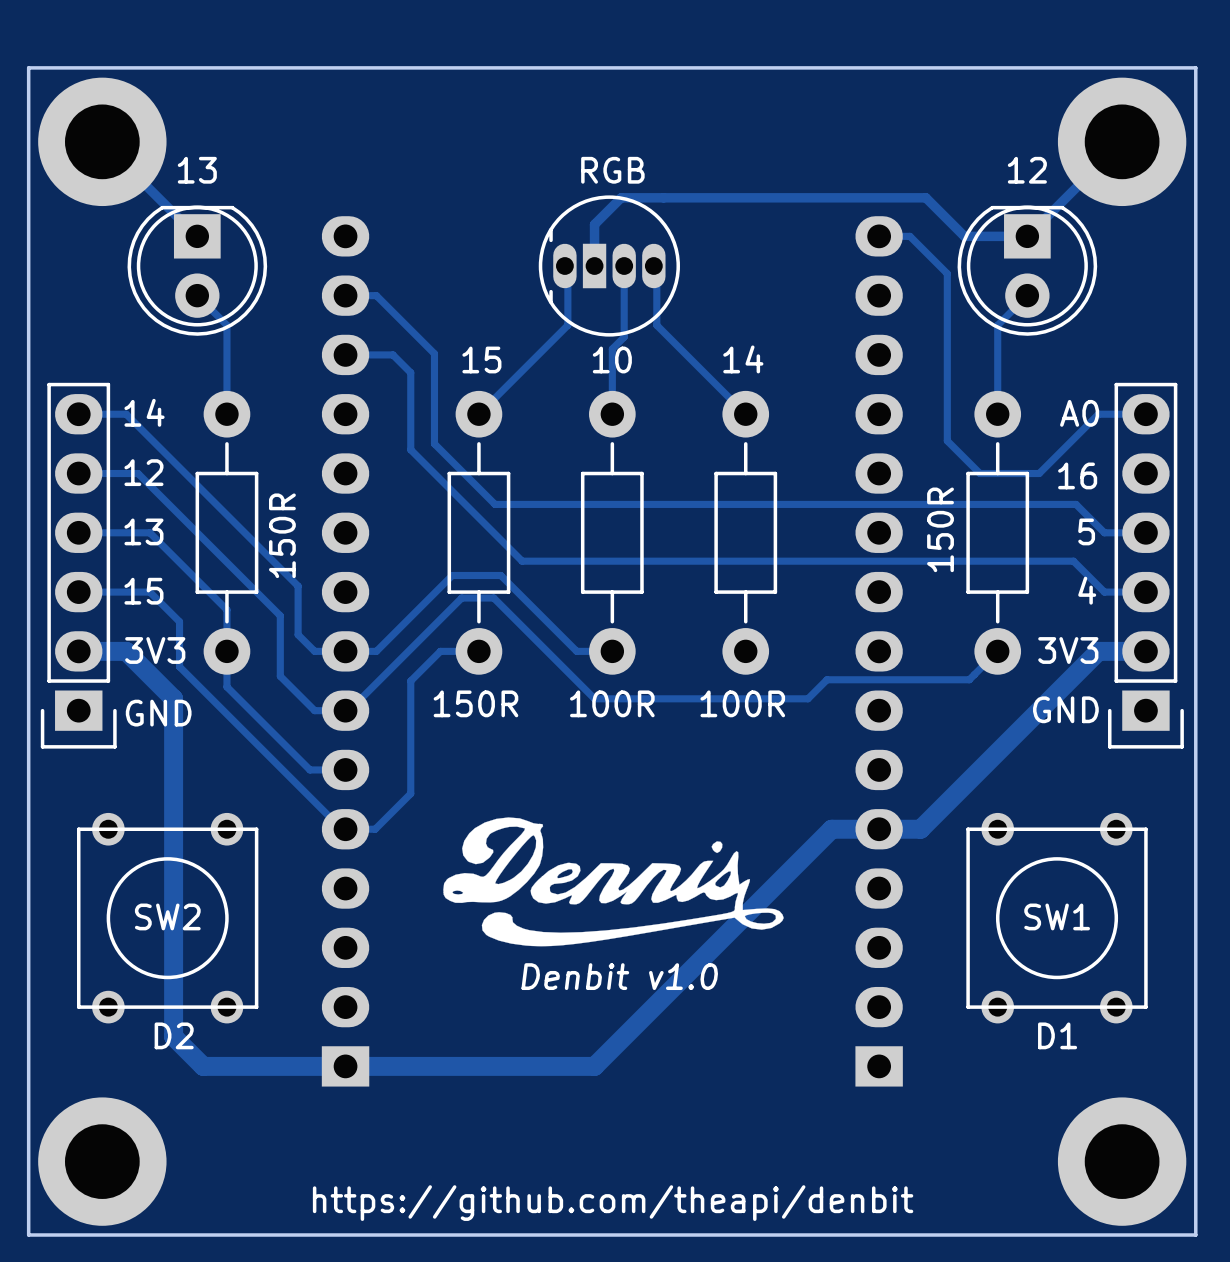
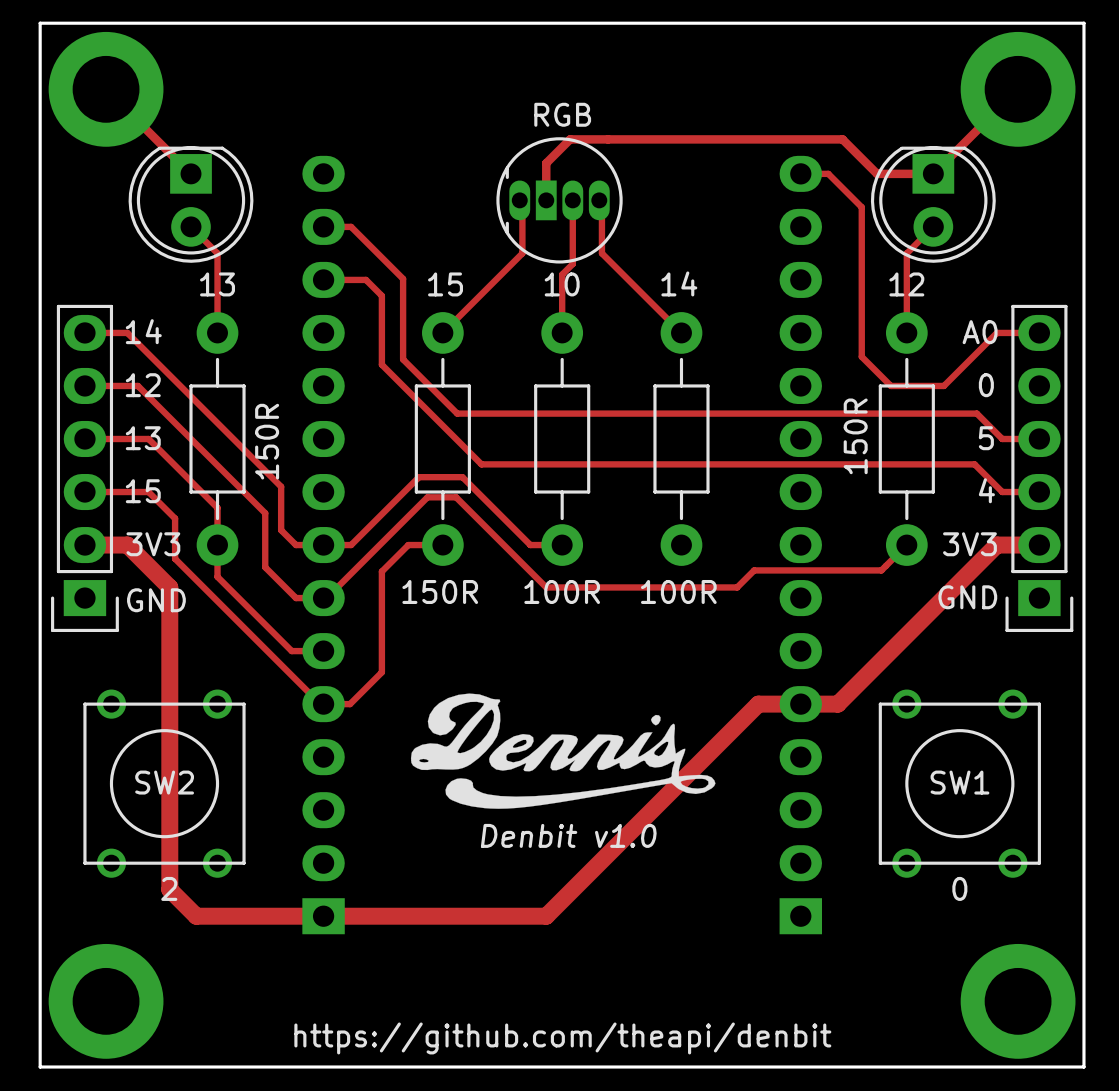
text position: 13 (197, 170) -> 13 (217, 284)
text position: 12 (1027, 170) -> 12 (906, 284)
text: 16 (1077, 475) -> 0 (986, 385)
text: D2 (174, 1035) -> 2 (169, 888)
text: D1 (1057, 1035) -> 0 (959, 888)

